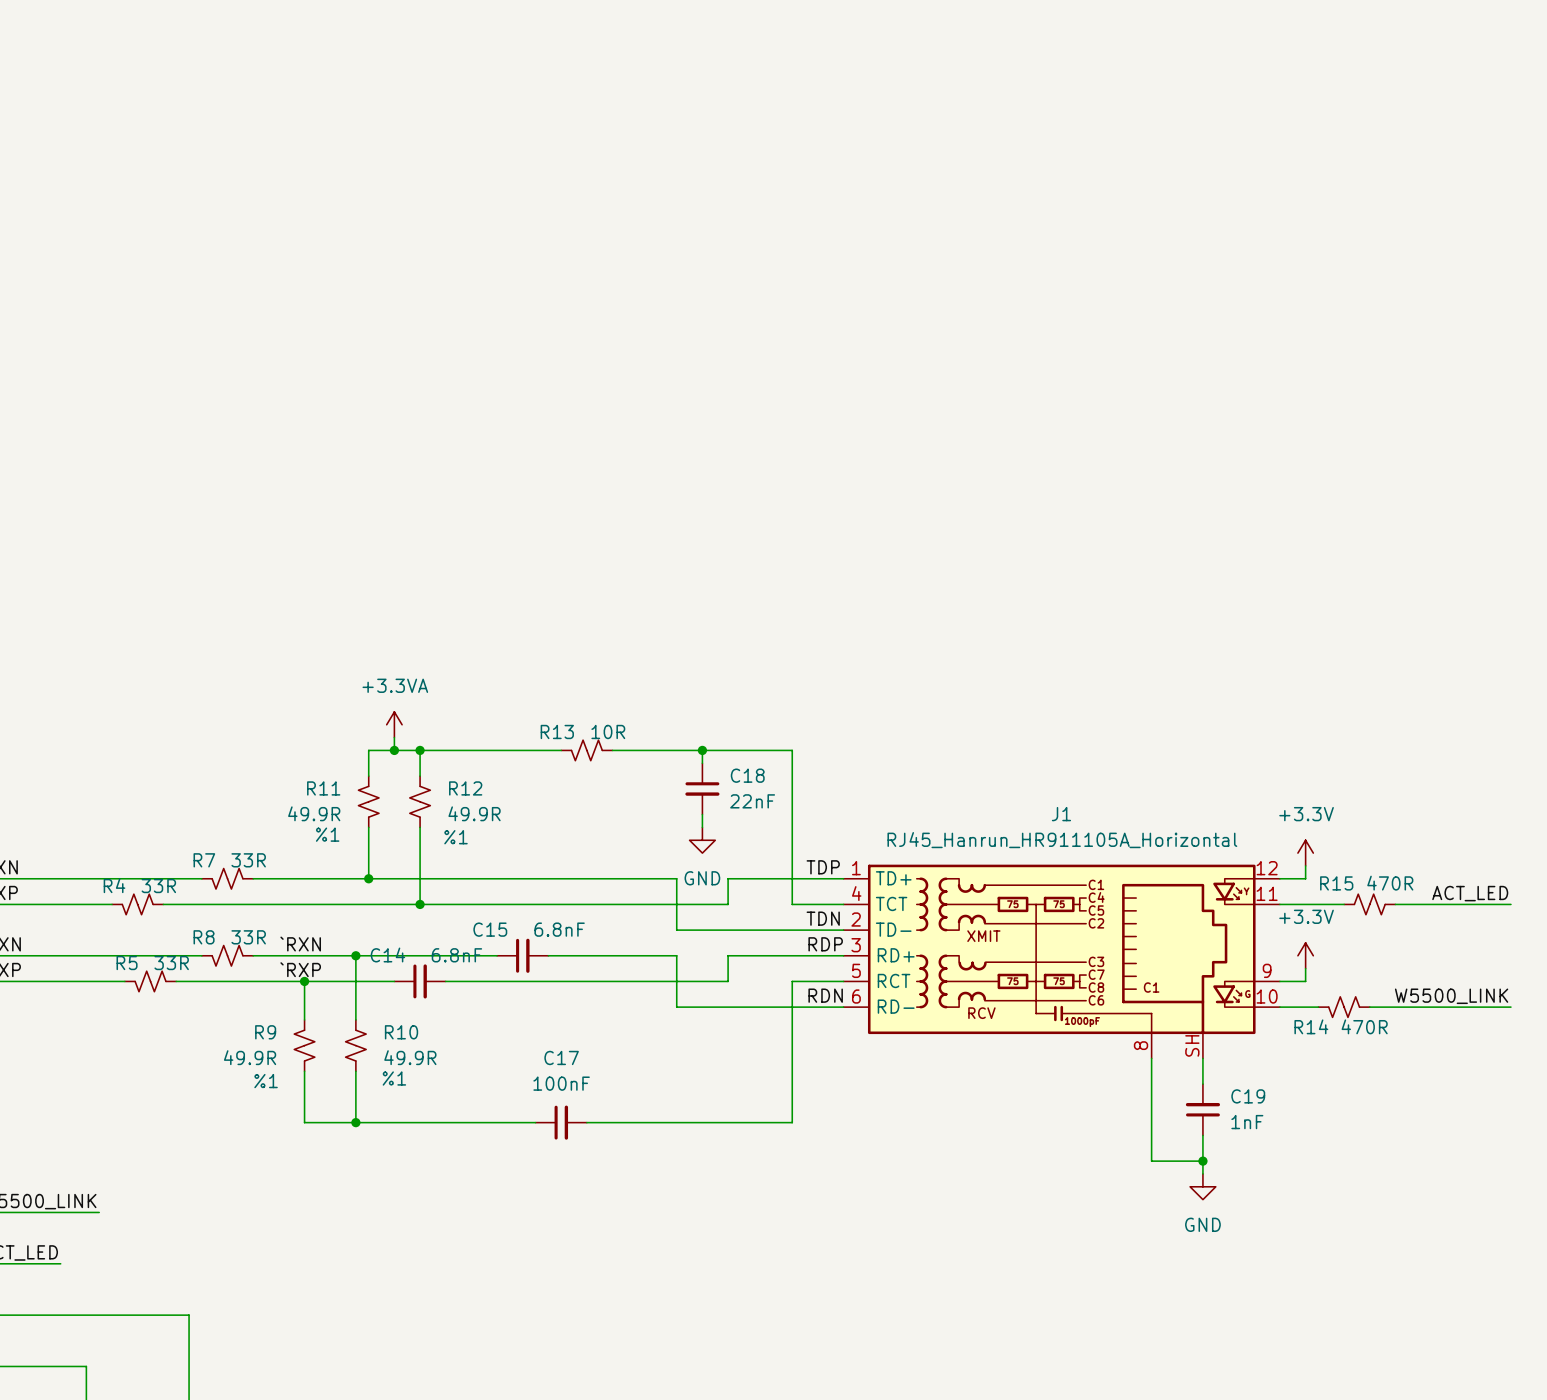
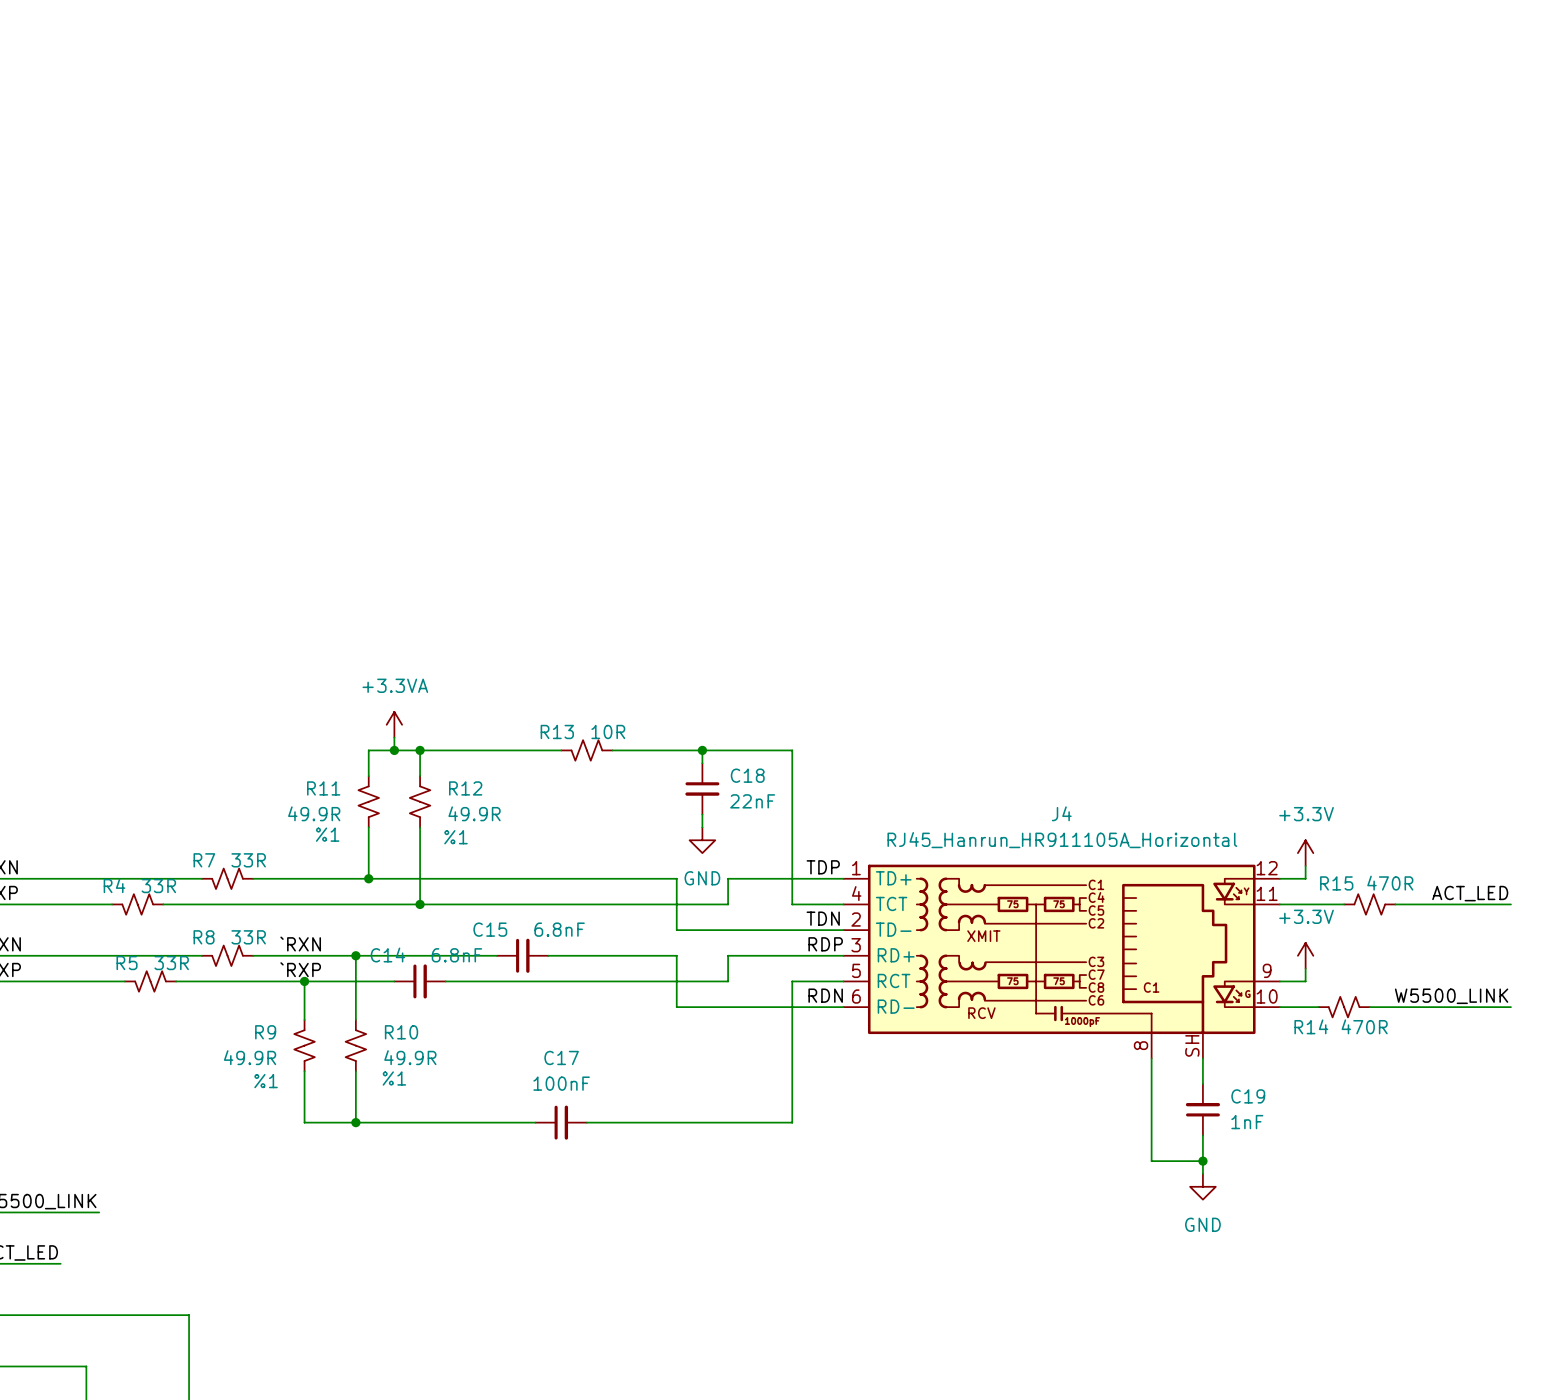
J1 name: J1 (1061, 814) -> J4 (1061, 813)

